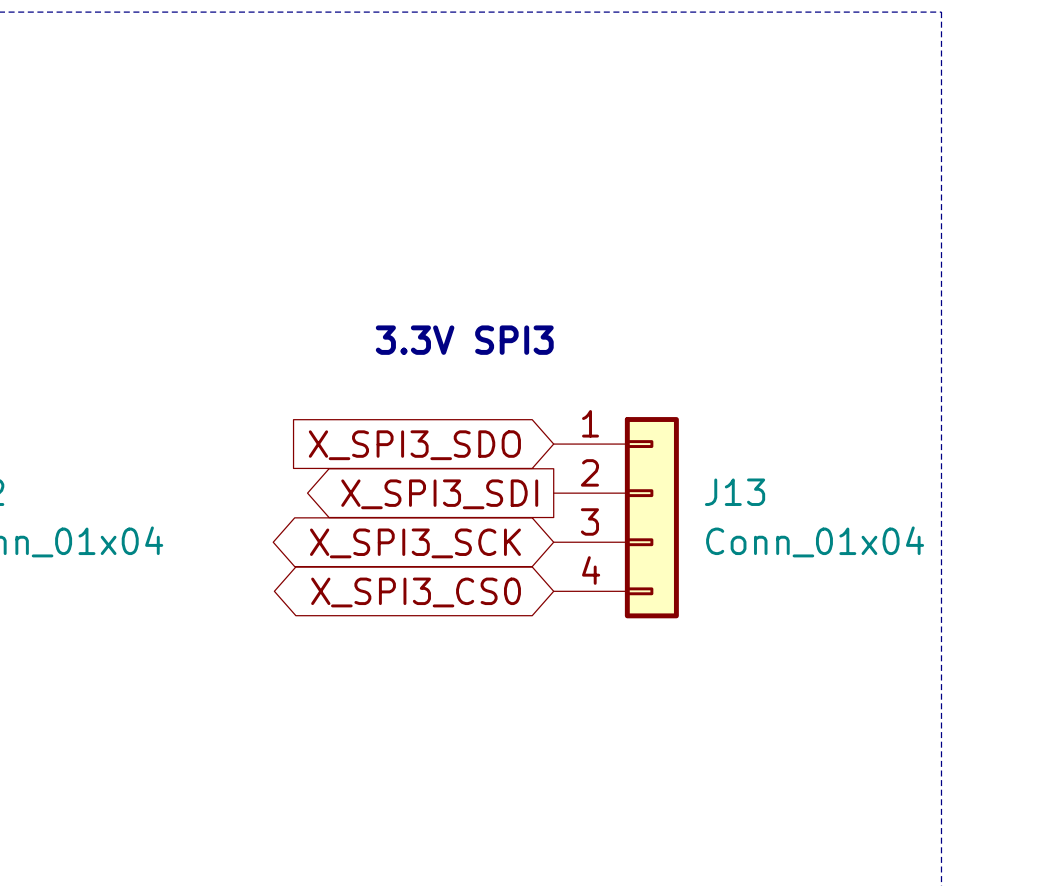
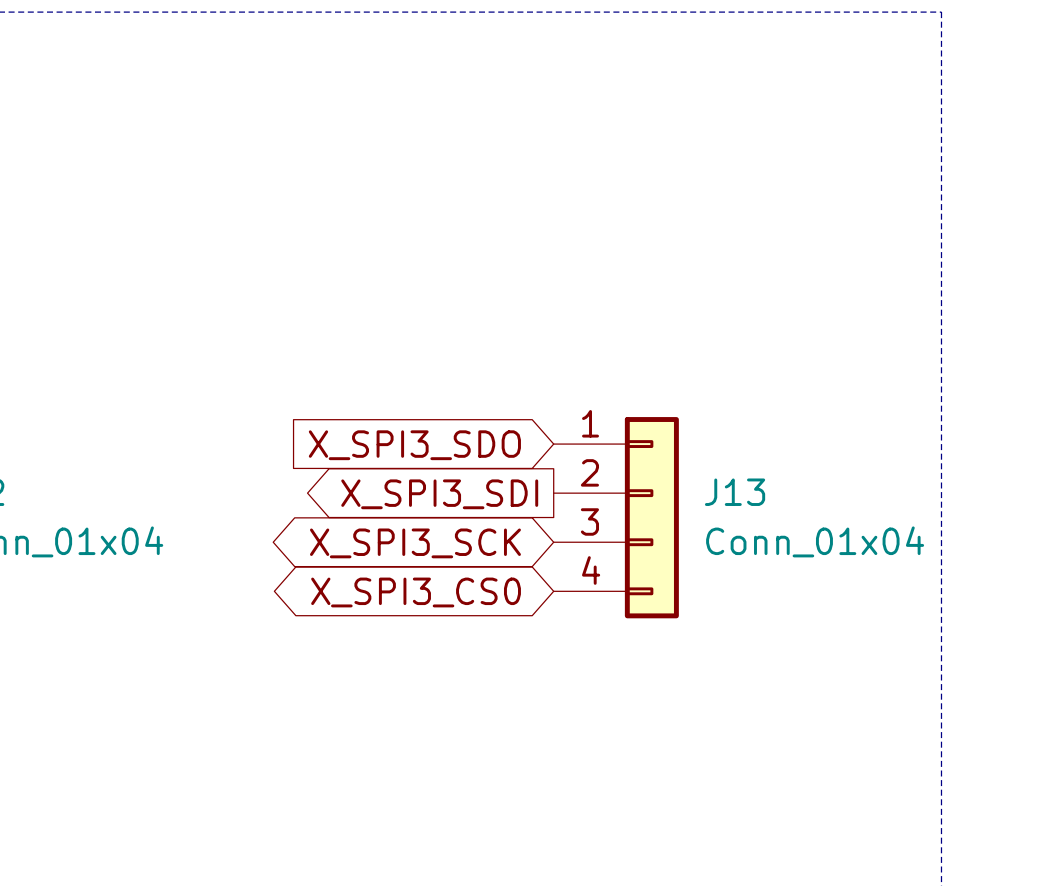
text: 3.3V SPI3 (464, 340) -> none

